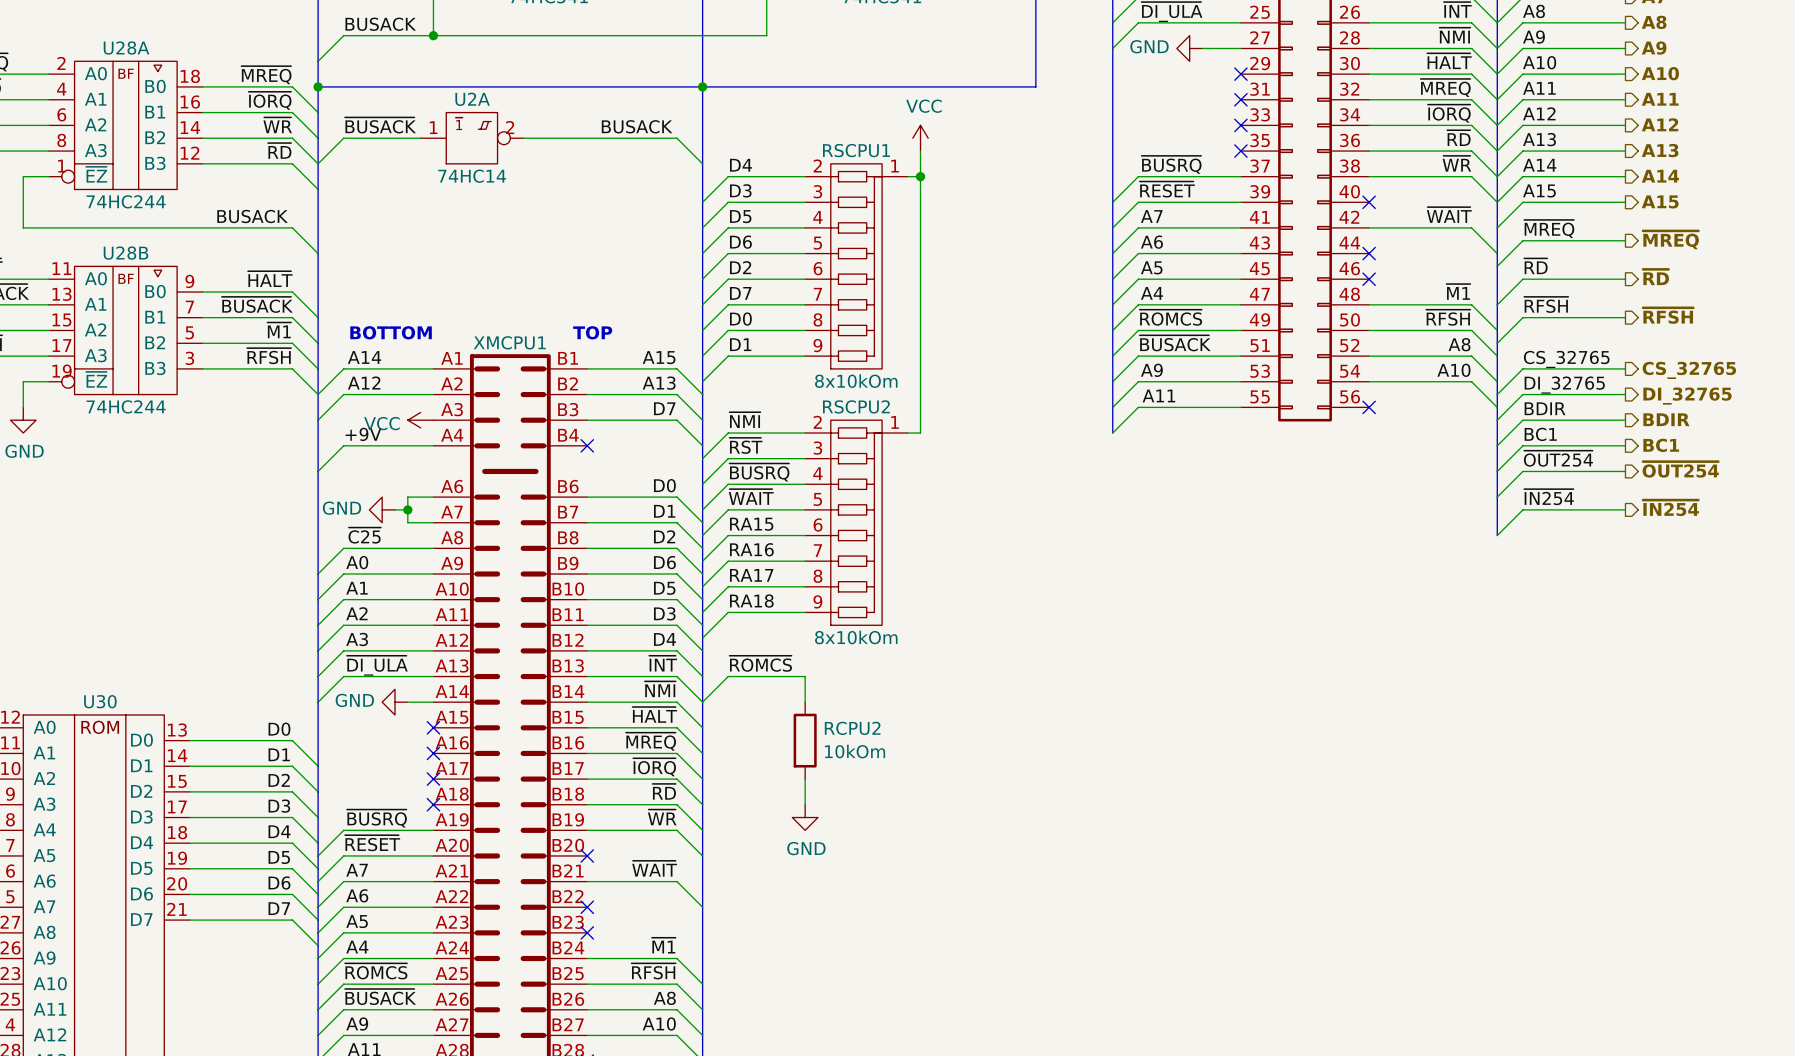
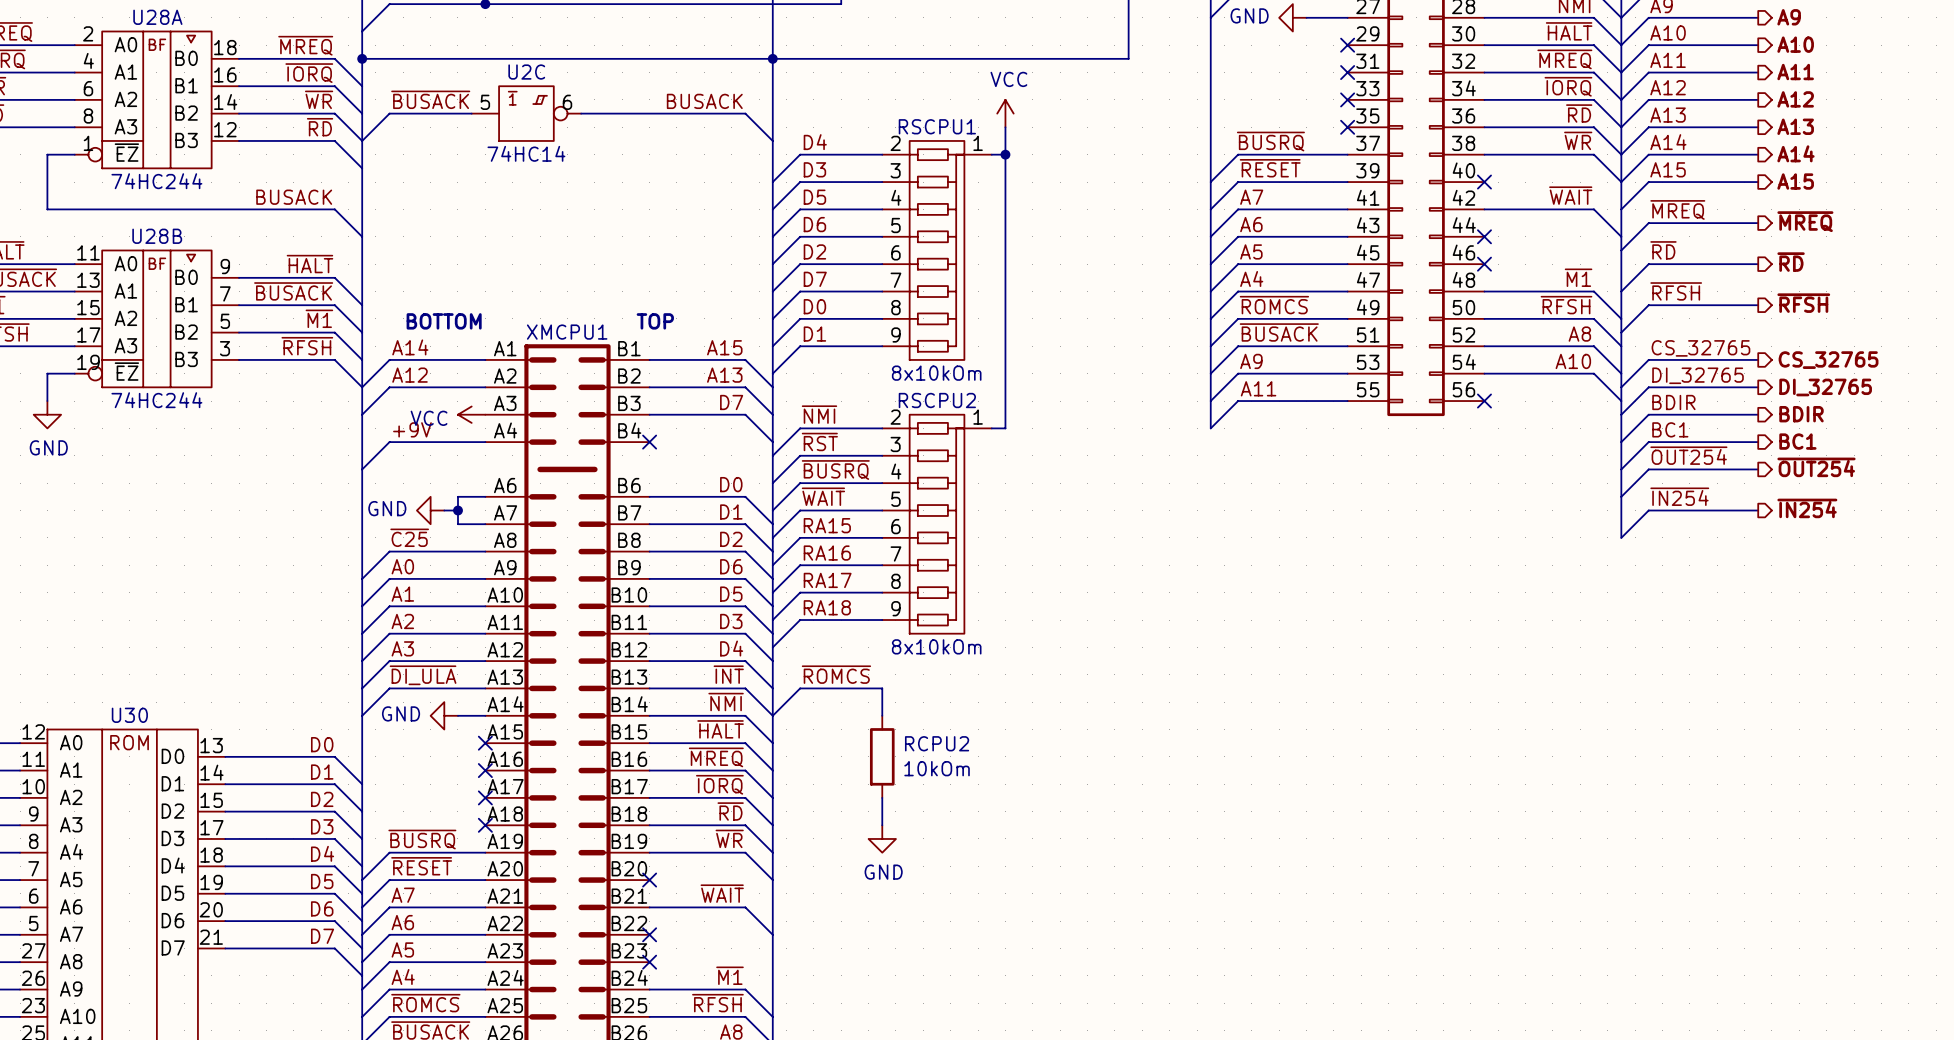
U2A name: U2A (472, 99) -> U2C (526, 72)
U2A pin number: 1 (433, 127) -> 5 (485, 102)
U2A pin number: 2 (510, 127) -> 6 (567, 102)

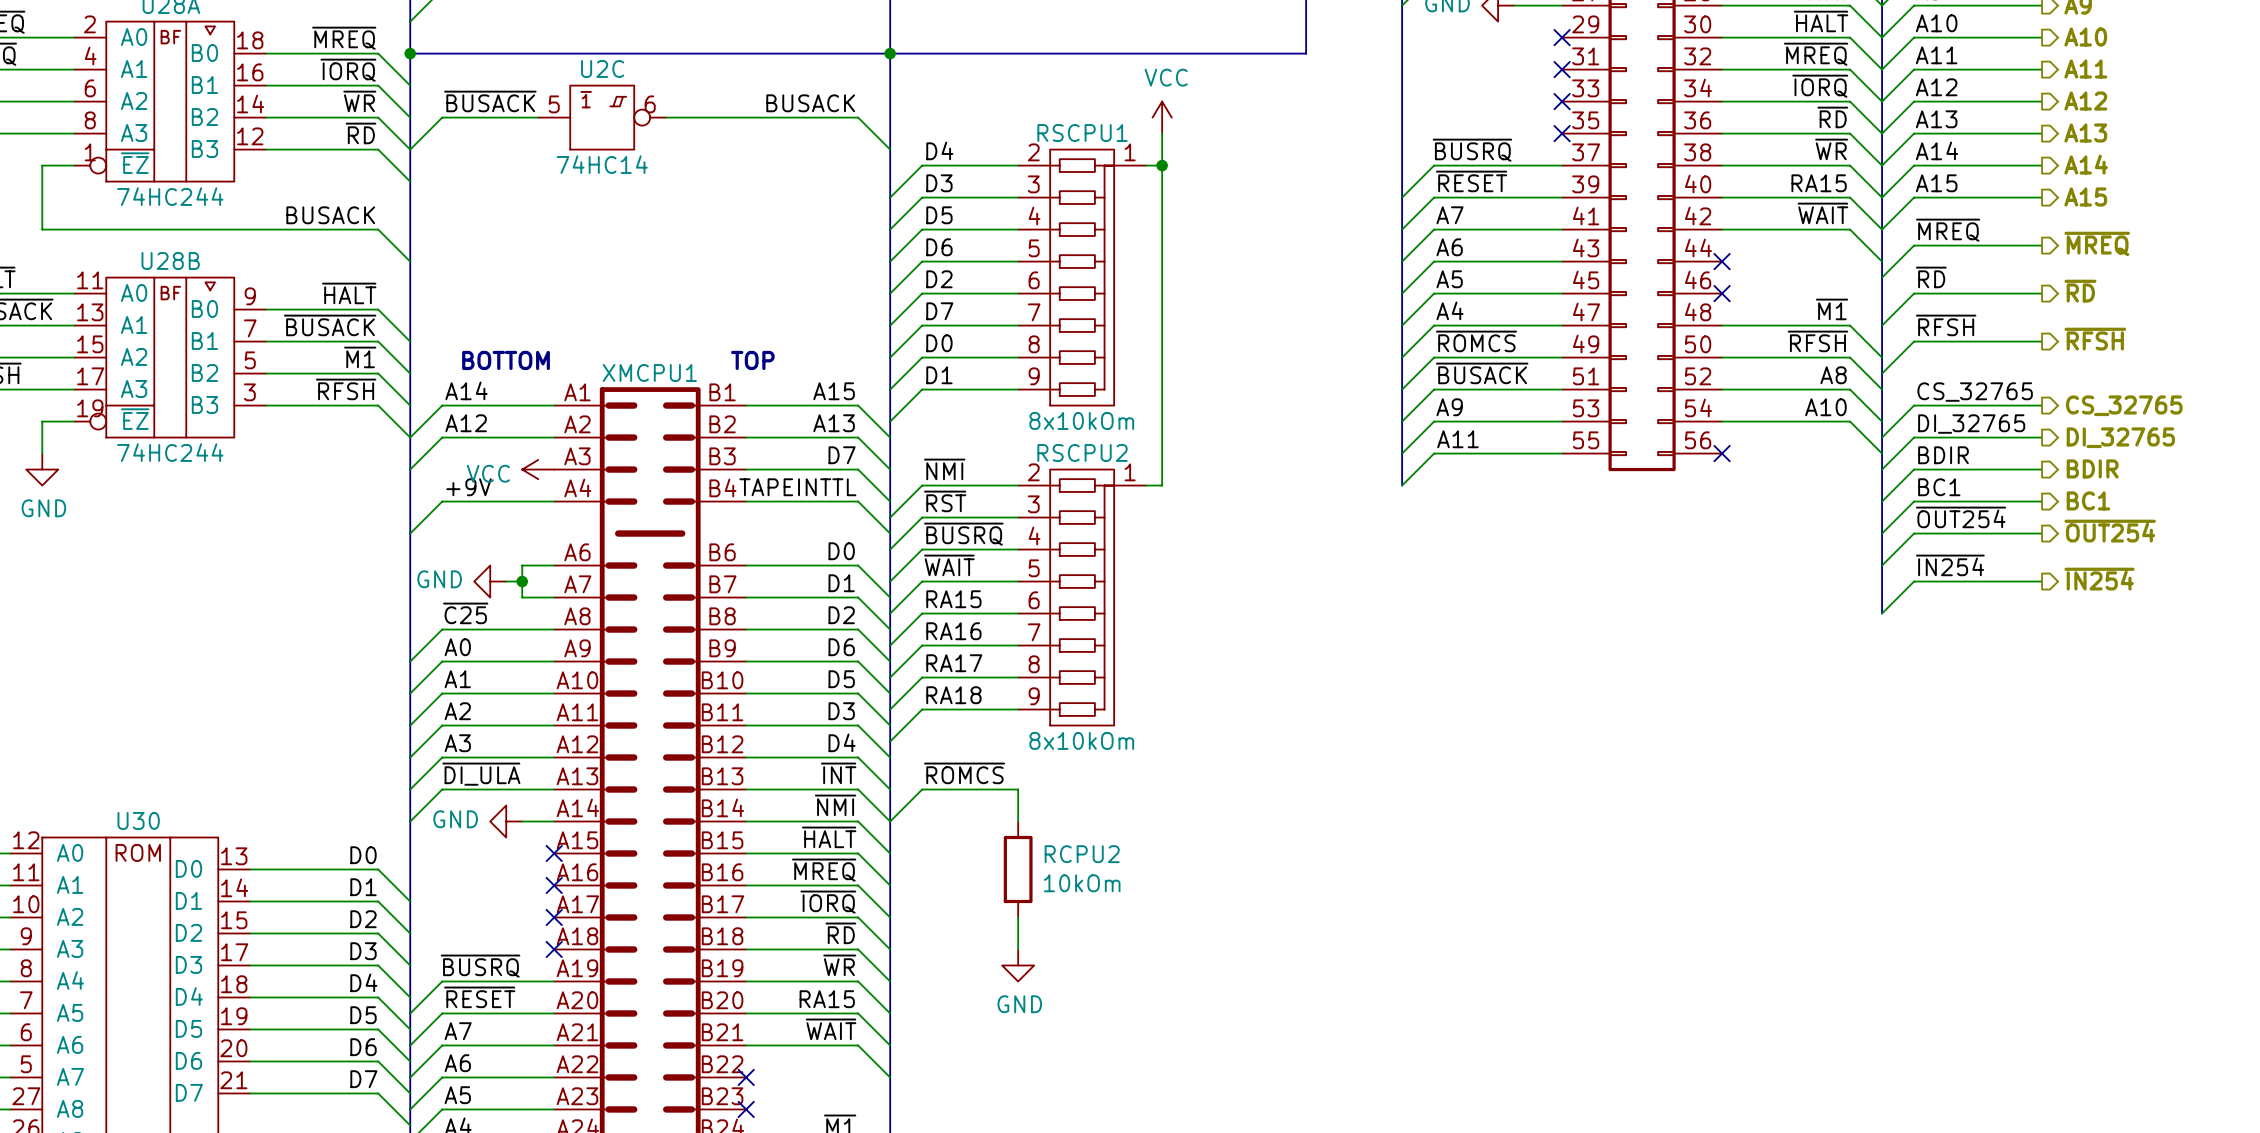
label: none -> RA15 (1819, 183)
wire: none -> (1722, 197) (1850, 197) (1882, 229)
no-connect mark: (1484, 182) -> none
label: none -> TAPEINTTL (797, 487)
wire: none -> (746, 501) (858, 501) (890, 533)
no-connect mark: (649, 442) -> none
label: none -> RA15 (827, 999)
wire: none -> (746, 1013) (858, 1013) (890, 1045)
no-connect mark: (649, 880) -> none

